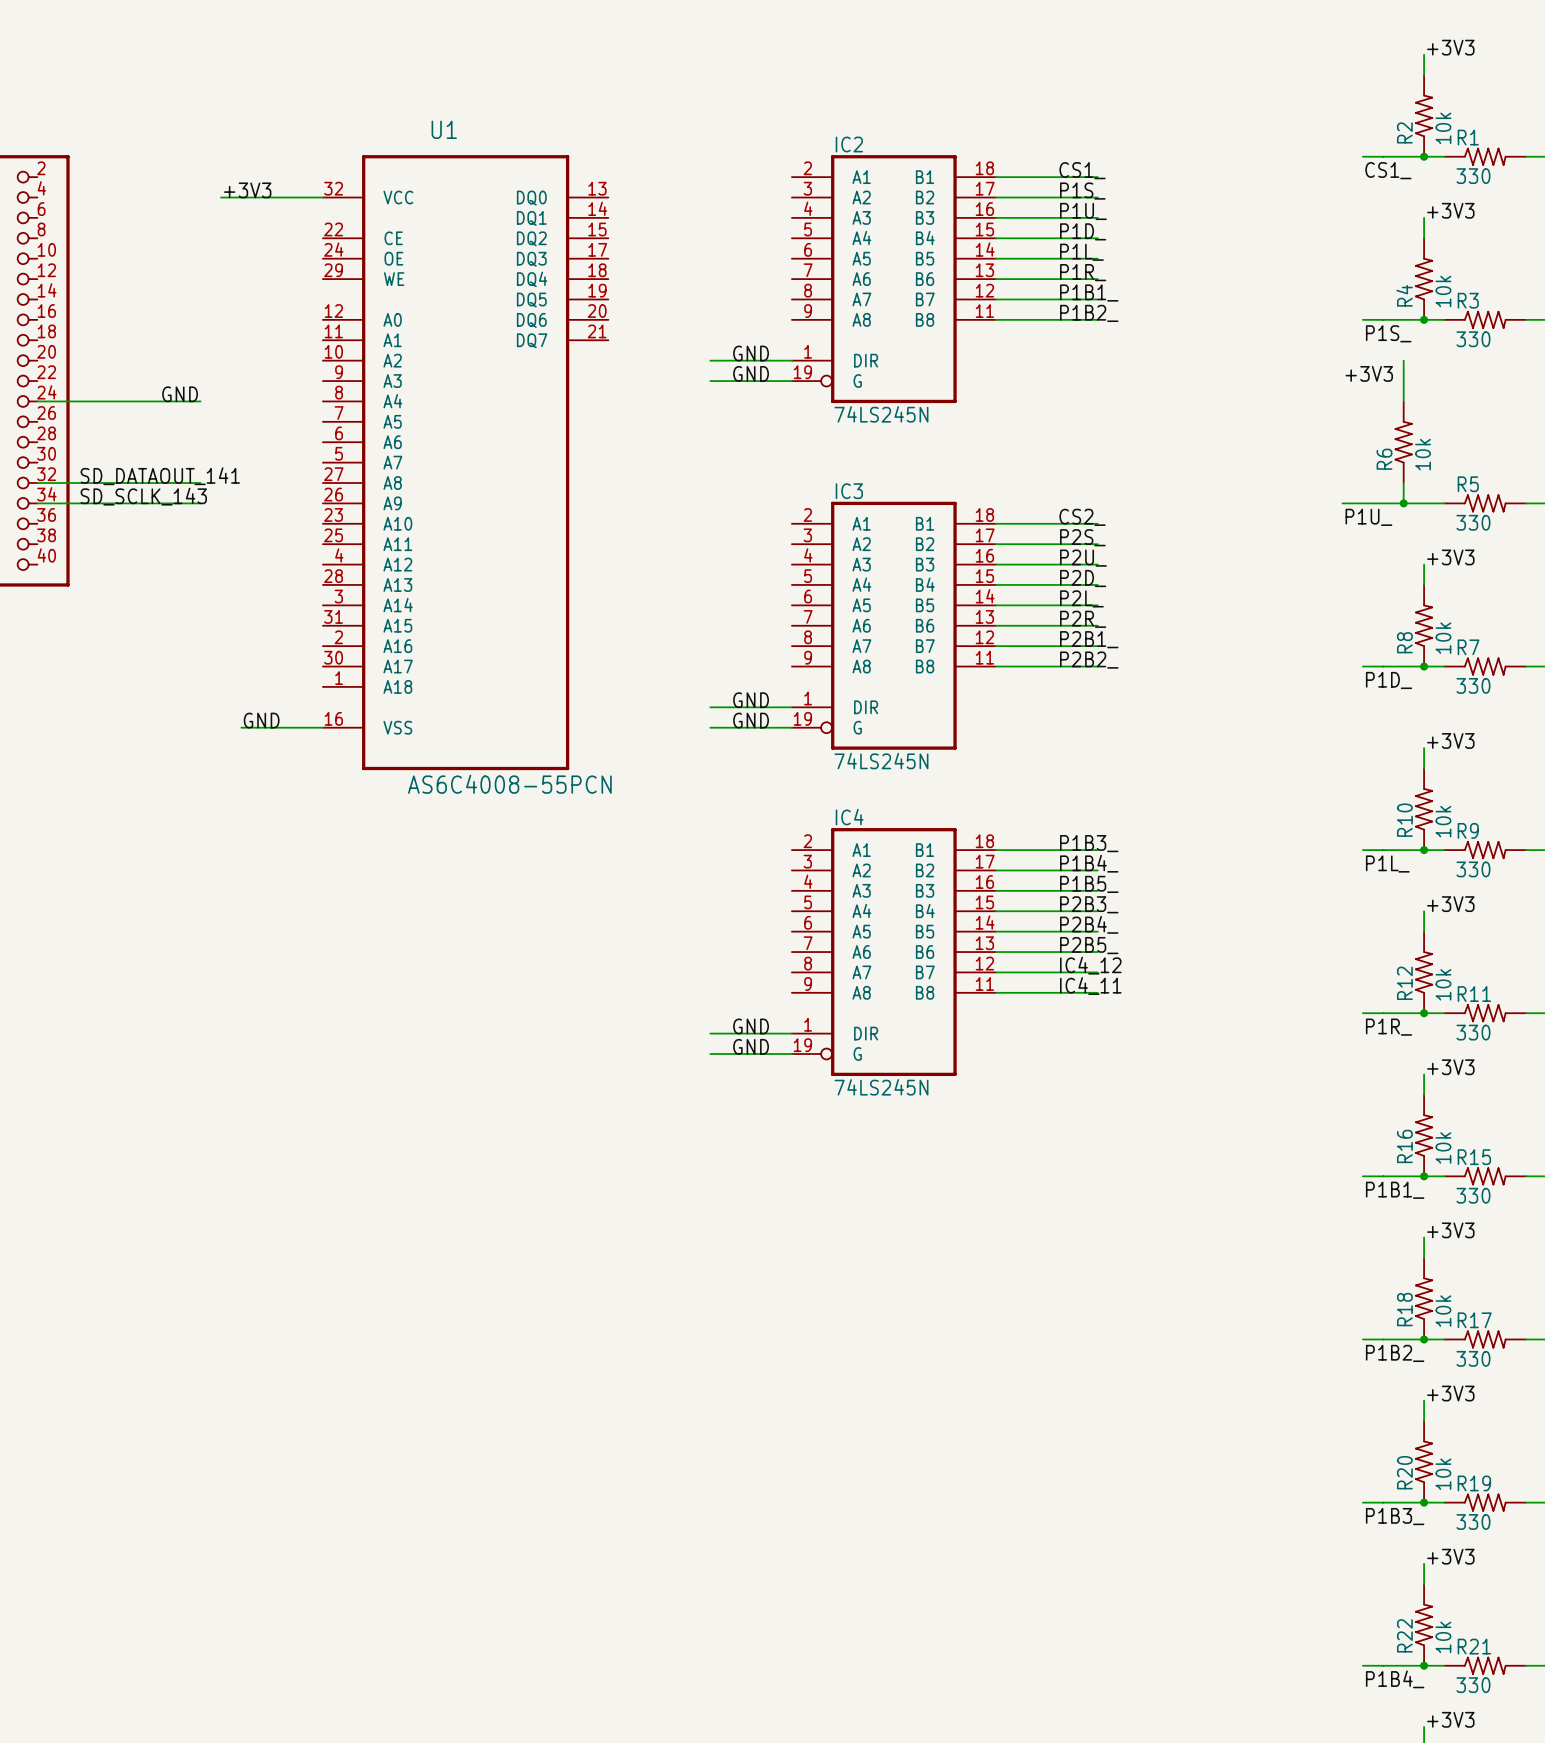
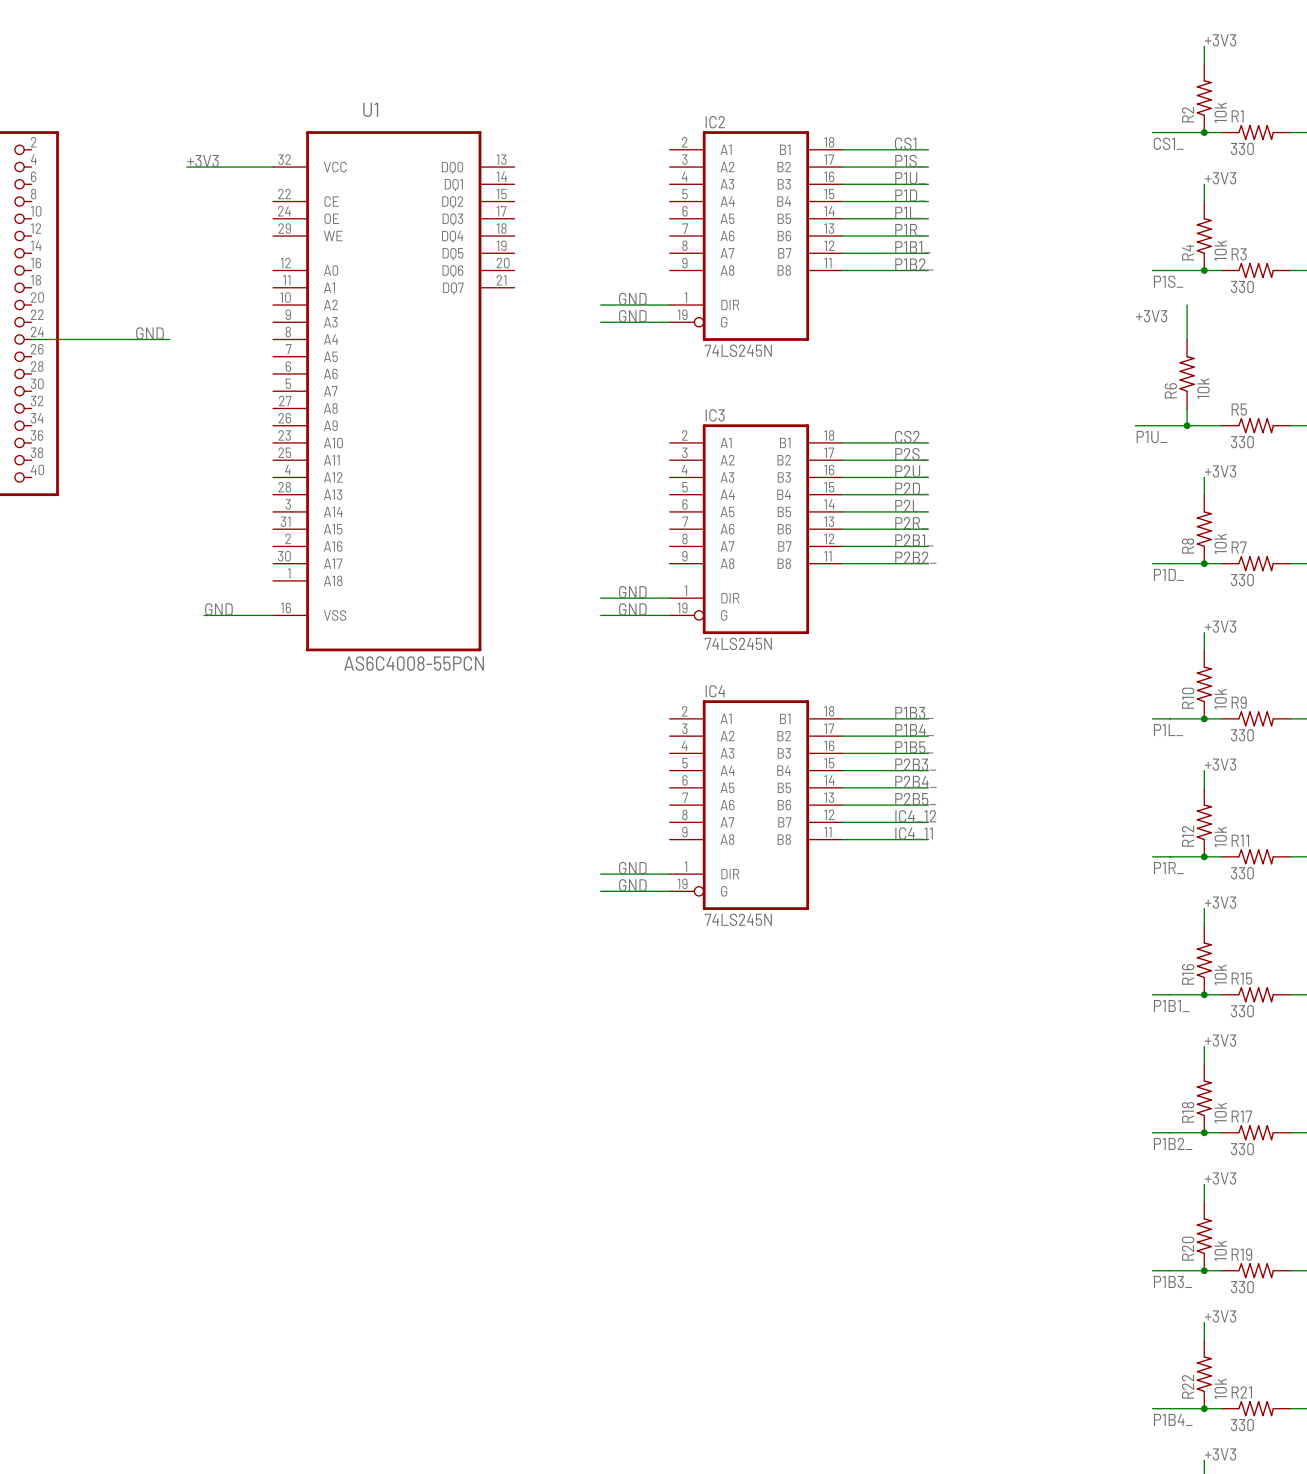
label: SD_DATAOUT_141 (160, 476) -> none
wire: (37, 483) (200, 483) -> none
label: SD_SCLK_143 (143, 496) -> none
wire: (37, 503) (200, 503) -> none

